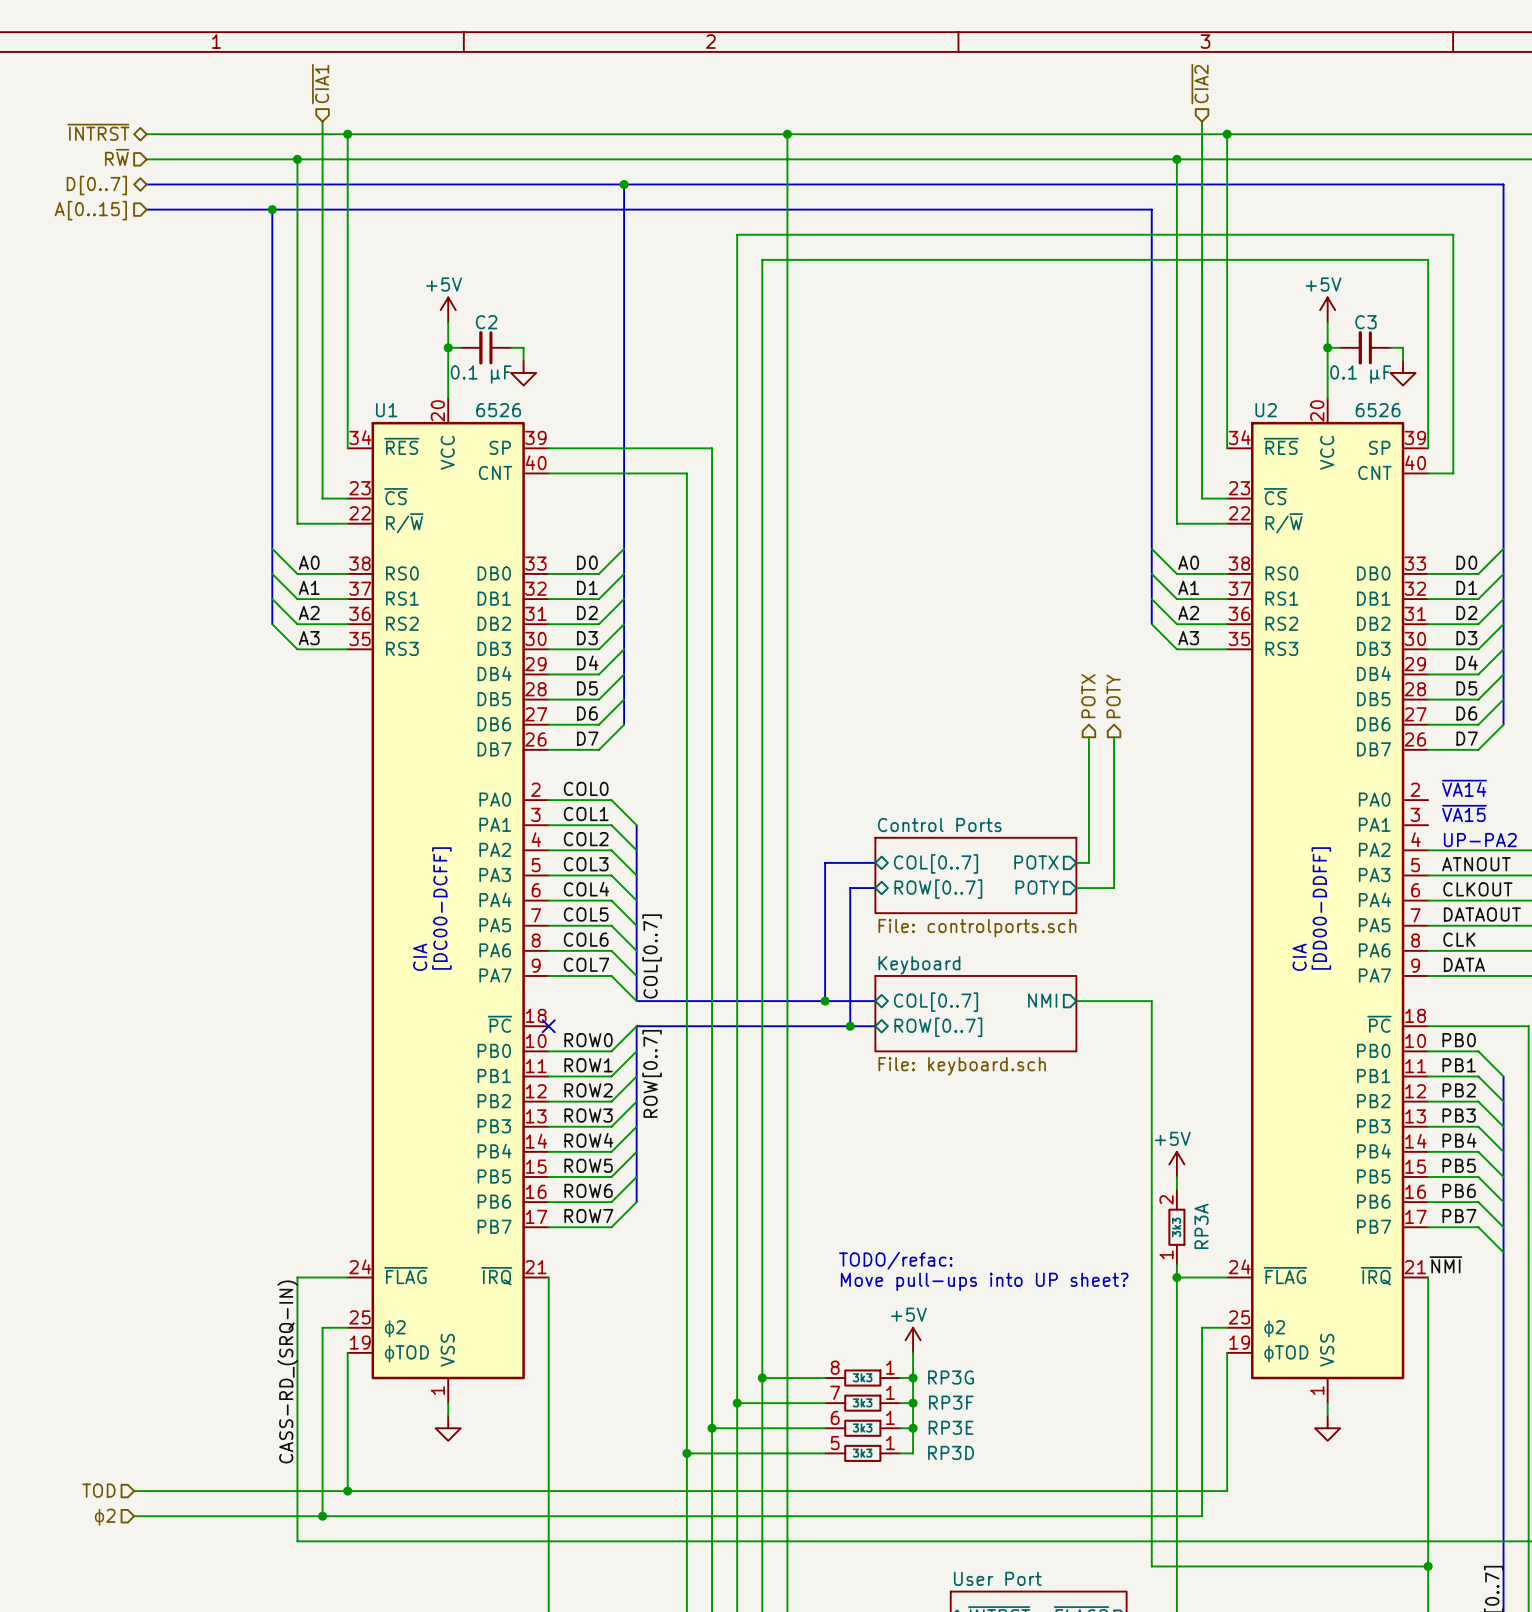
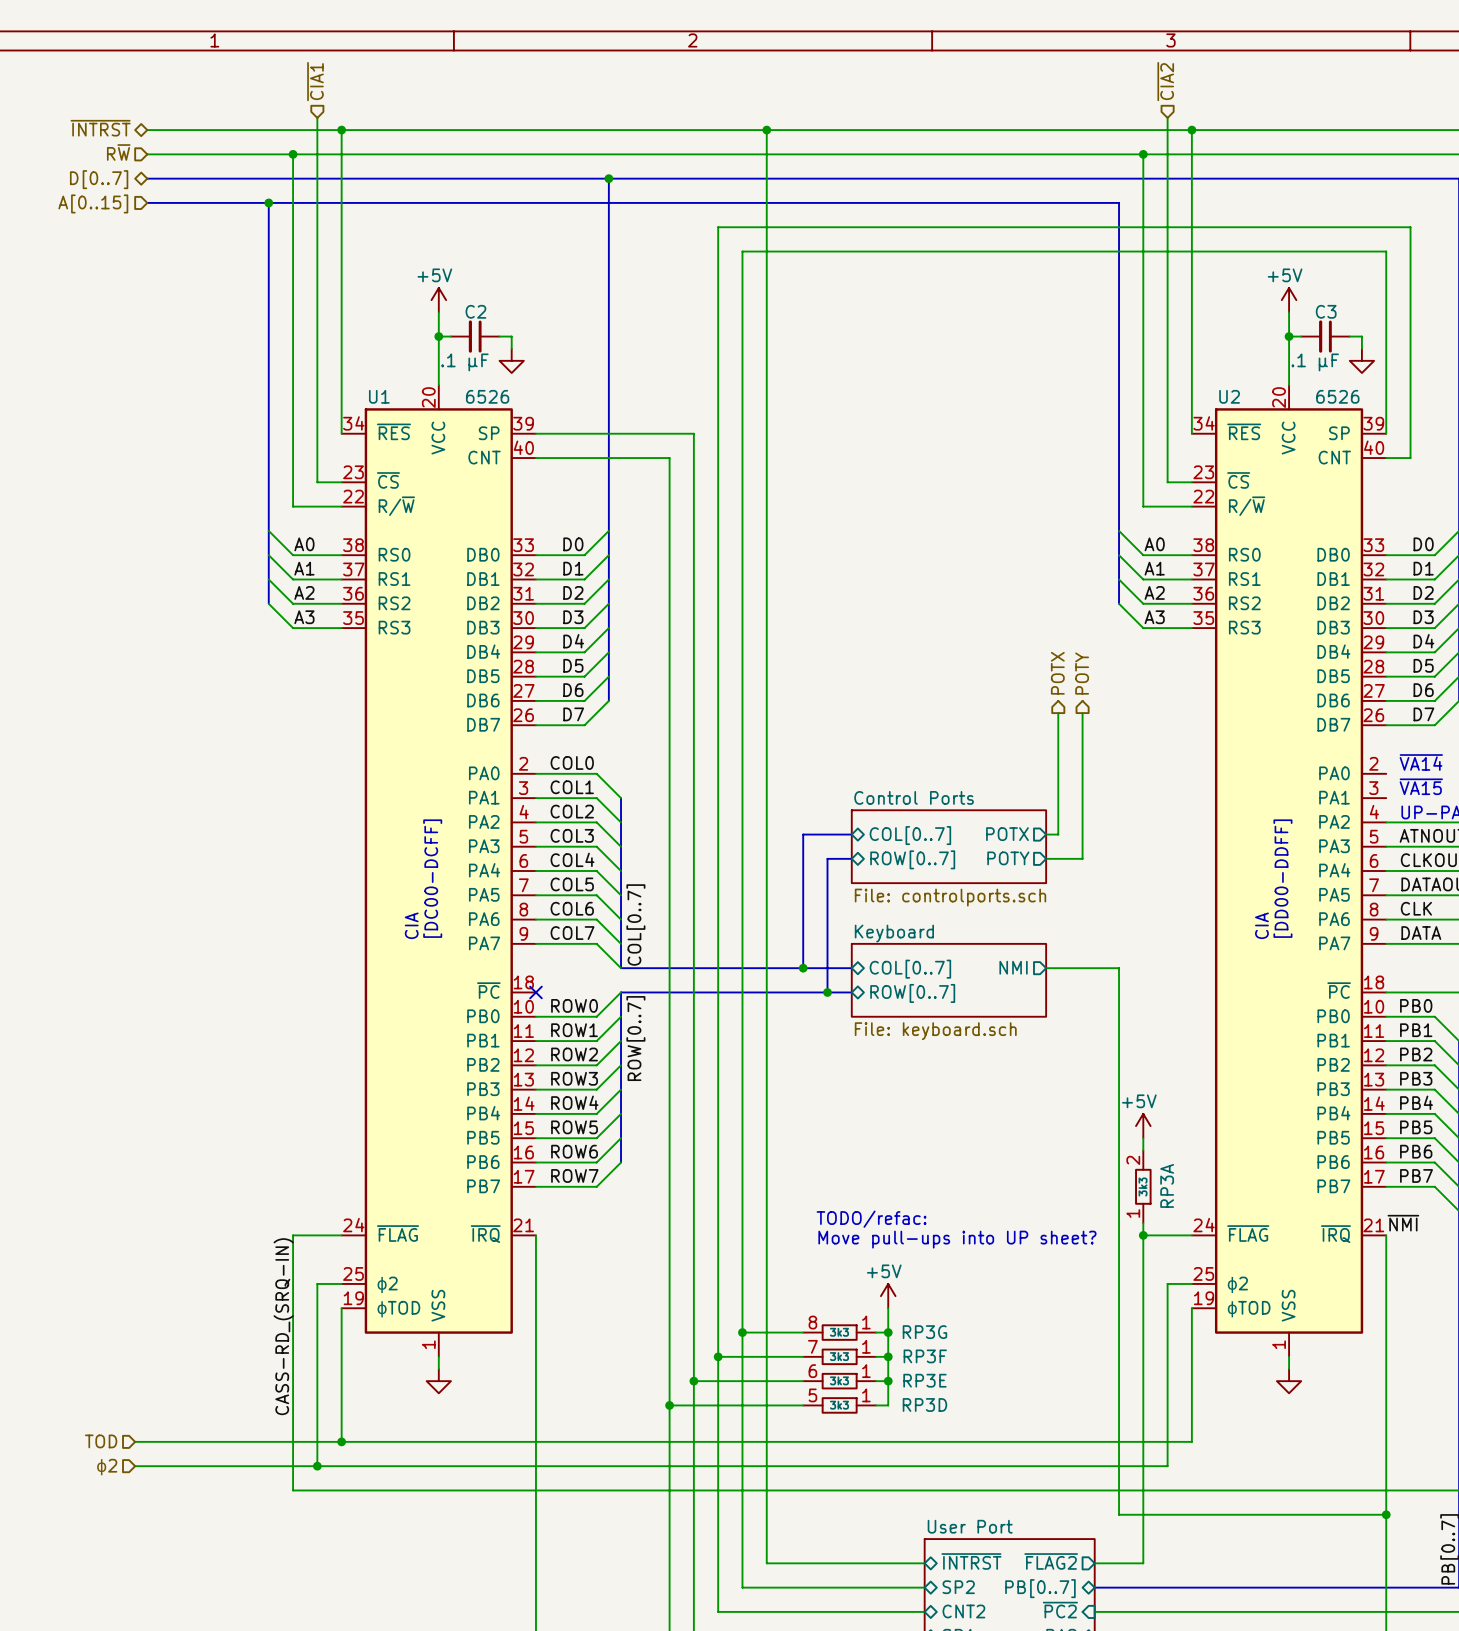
C2 value: 0.1 μF (481, 374) -> .1 μF (464, 362)
C3 value: 0.1 μF (1360, 374) -> .1 μF (1315, 362)

